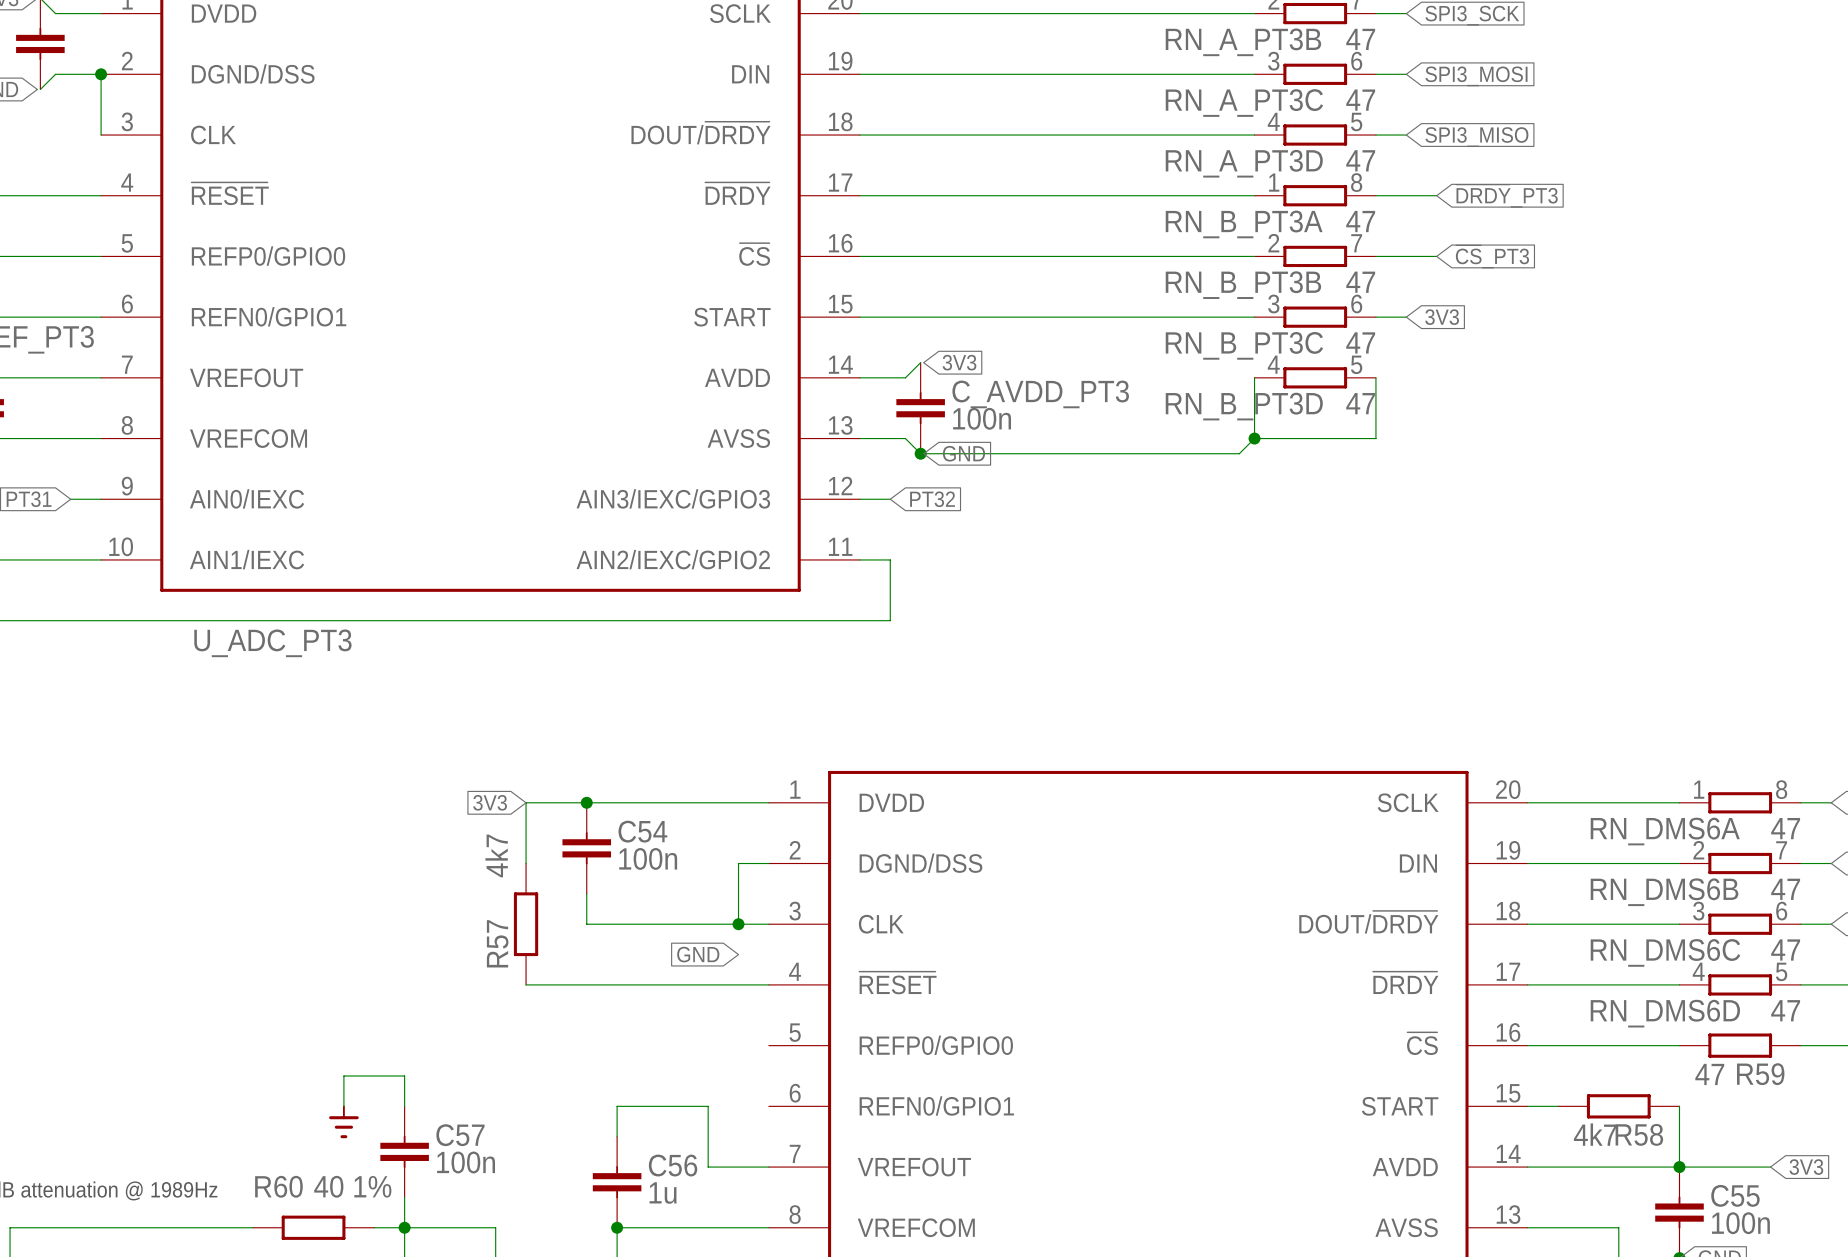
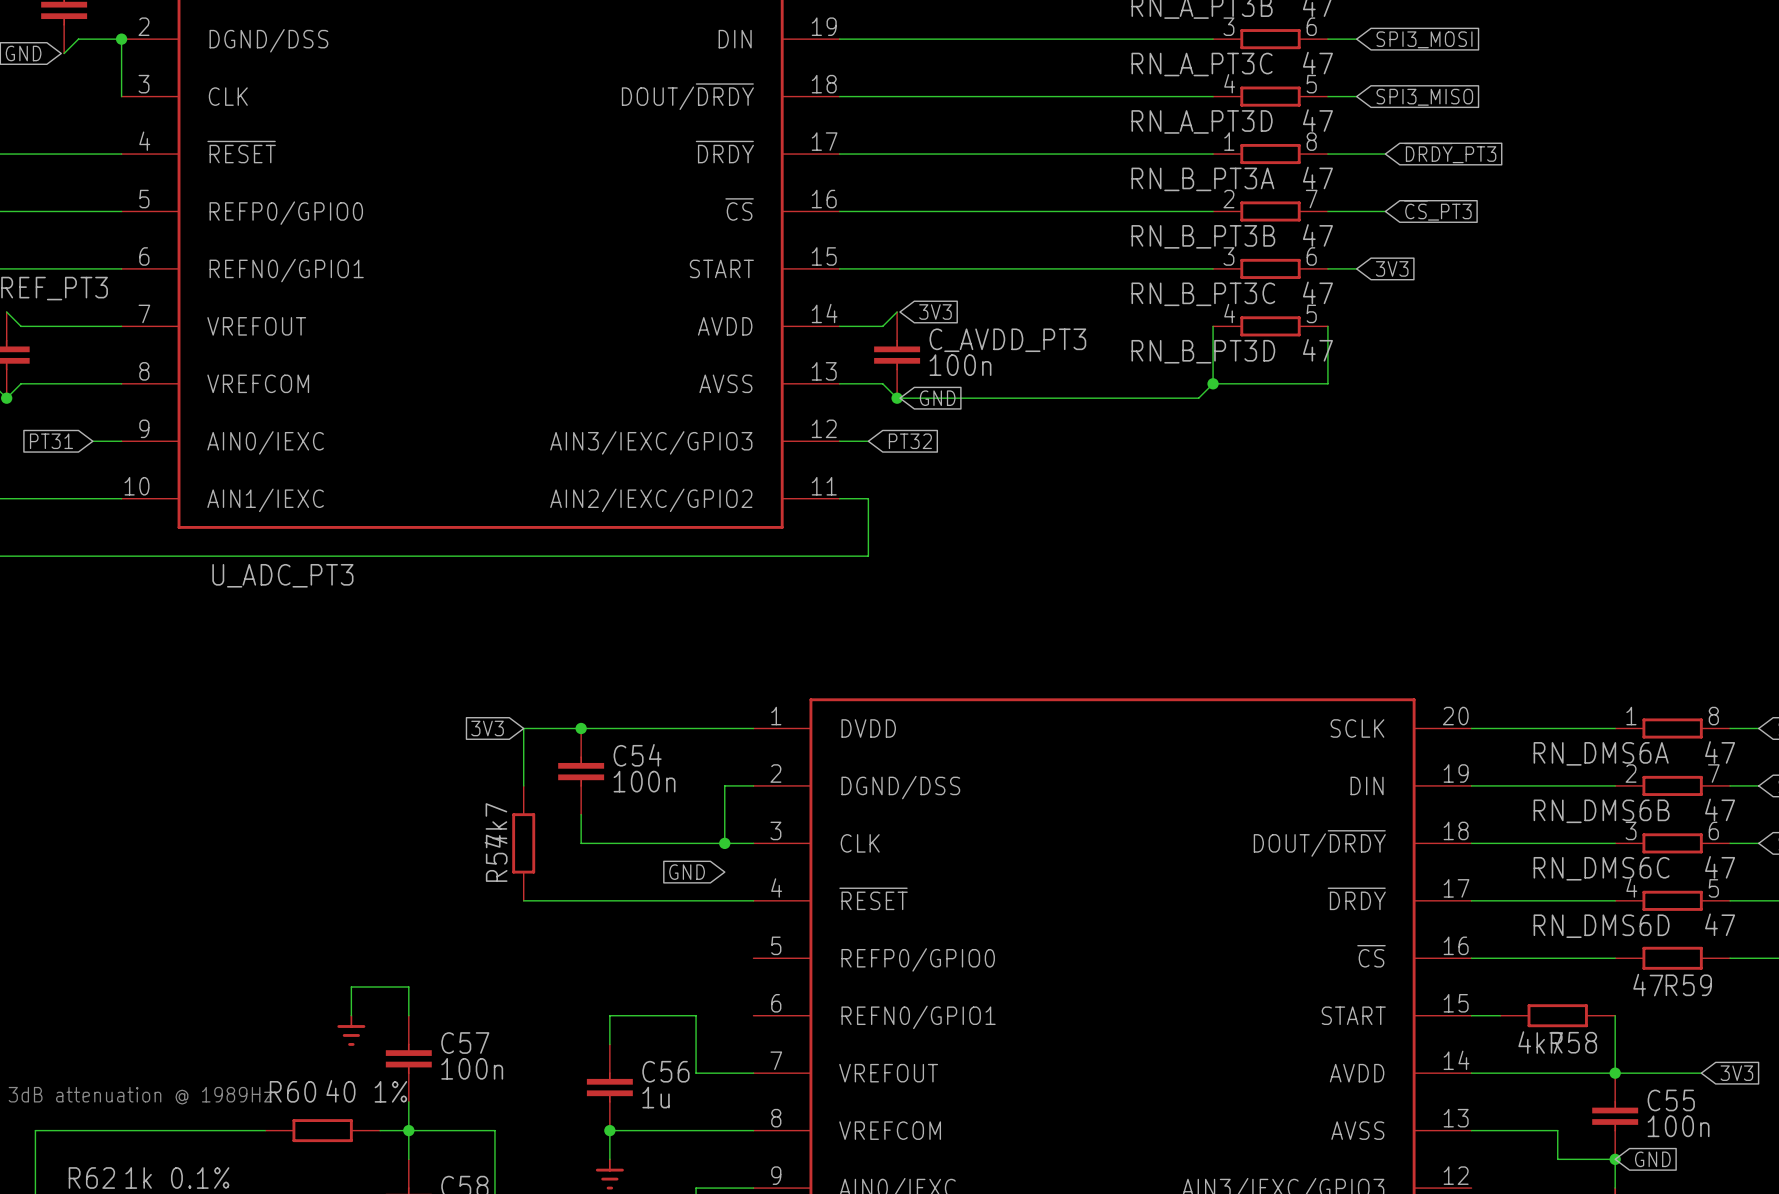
R57 value position: 4k7 (496, 855) -> 4k7 (495, 825)

